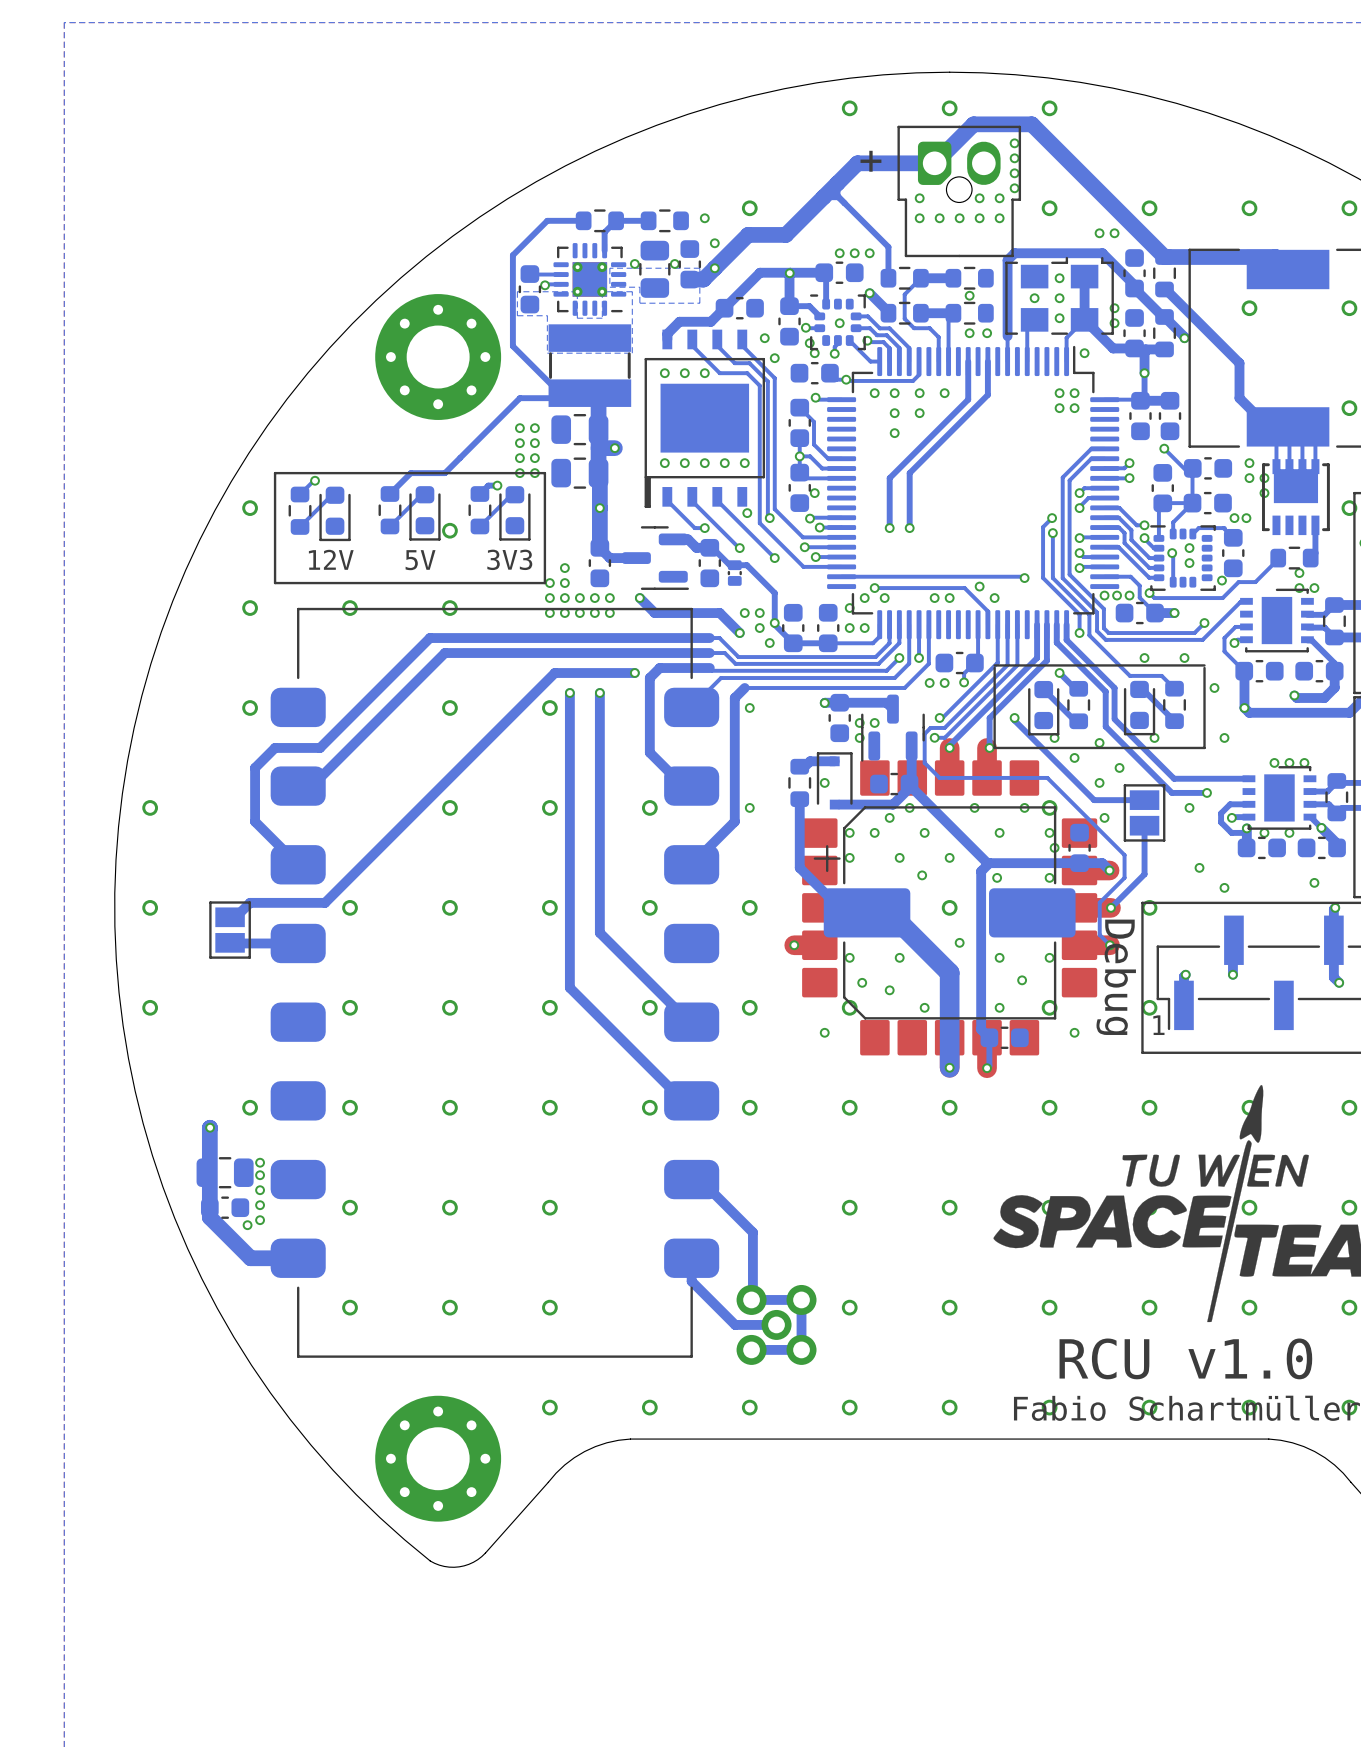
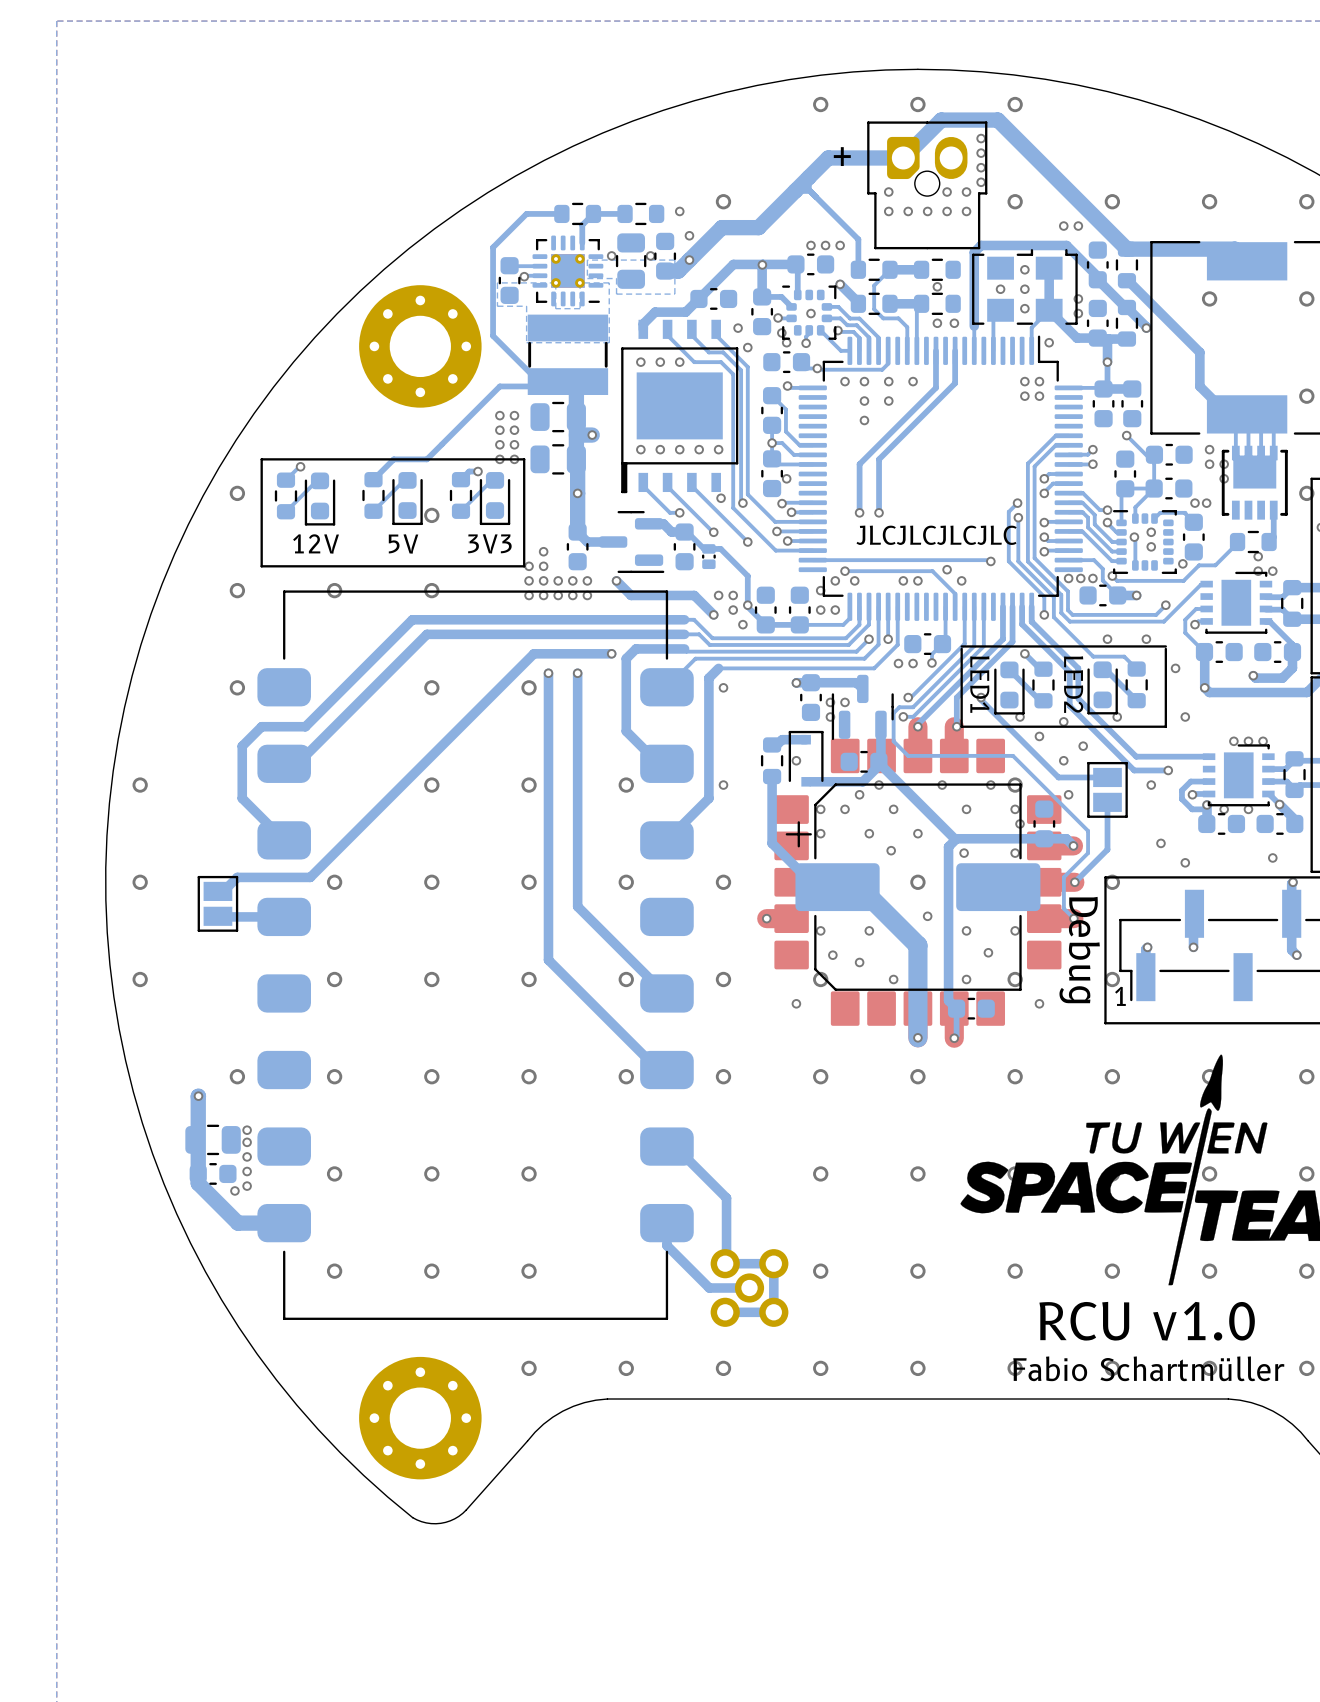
text: none -> JLCJLCJLCJLC (936, 535)
text: none -> LED1 (979, 684)
text: none -> LED2 (1073, 684)

